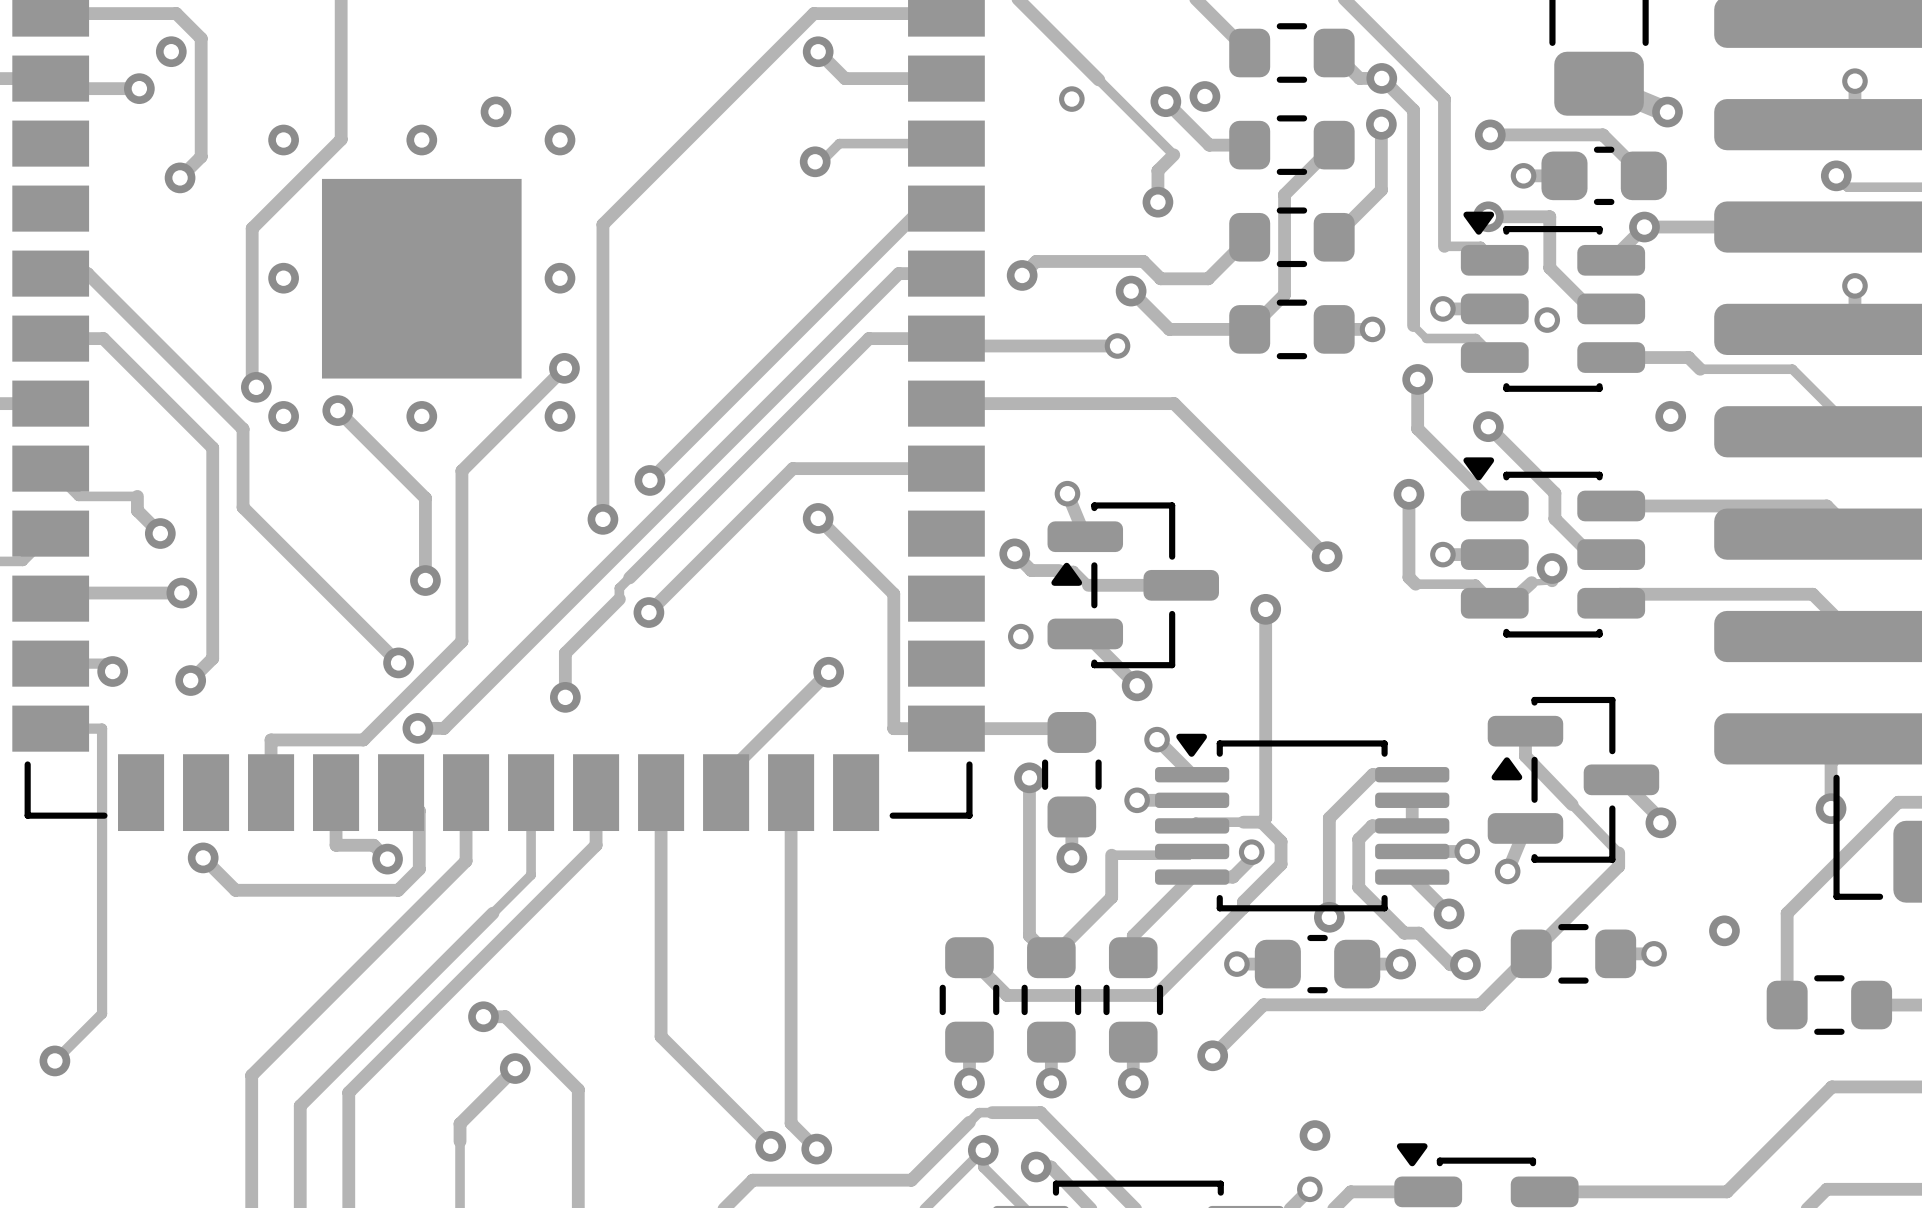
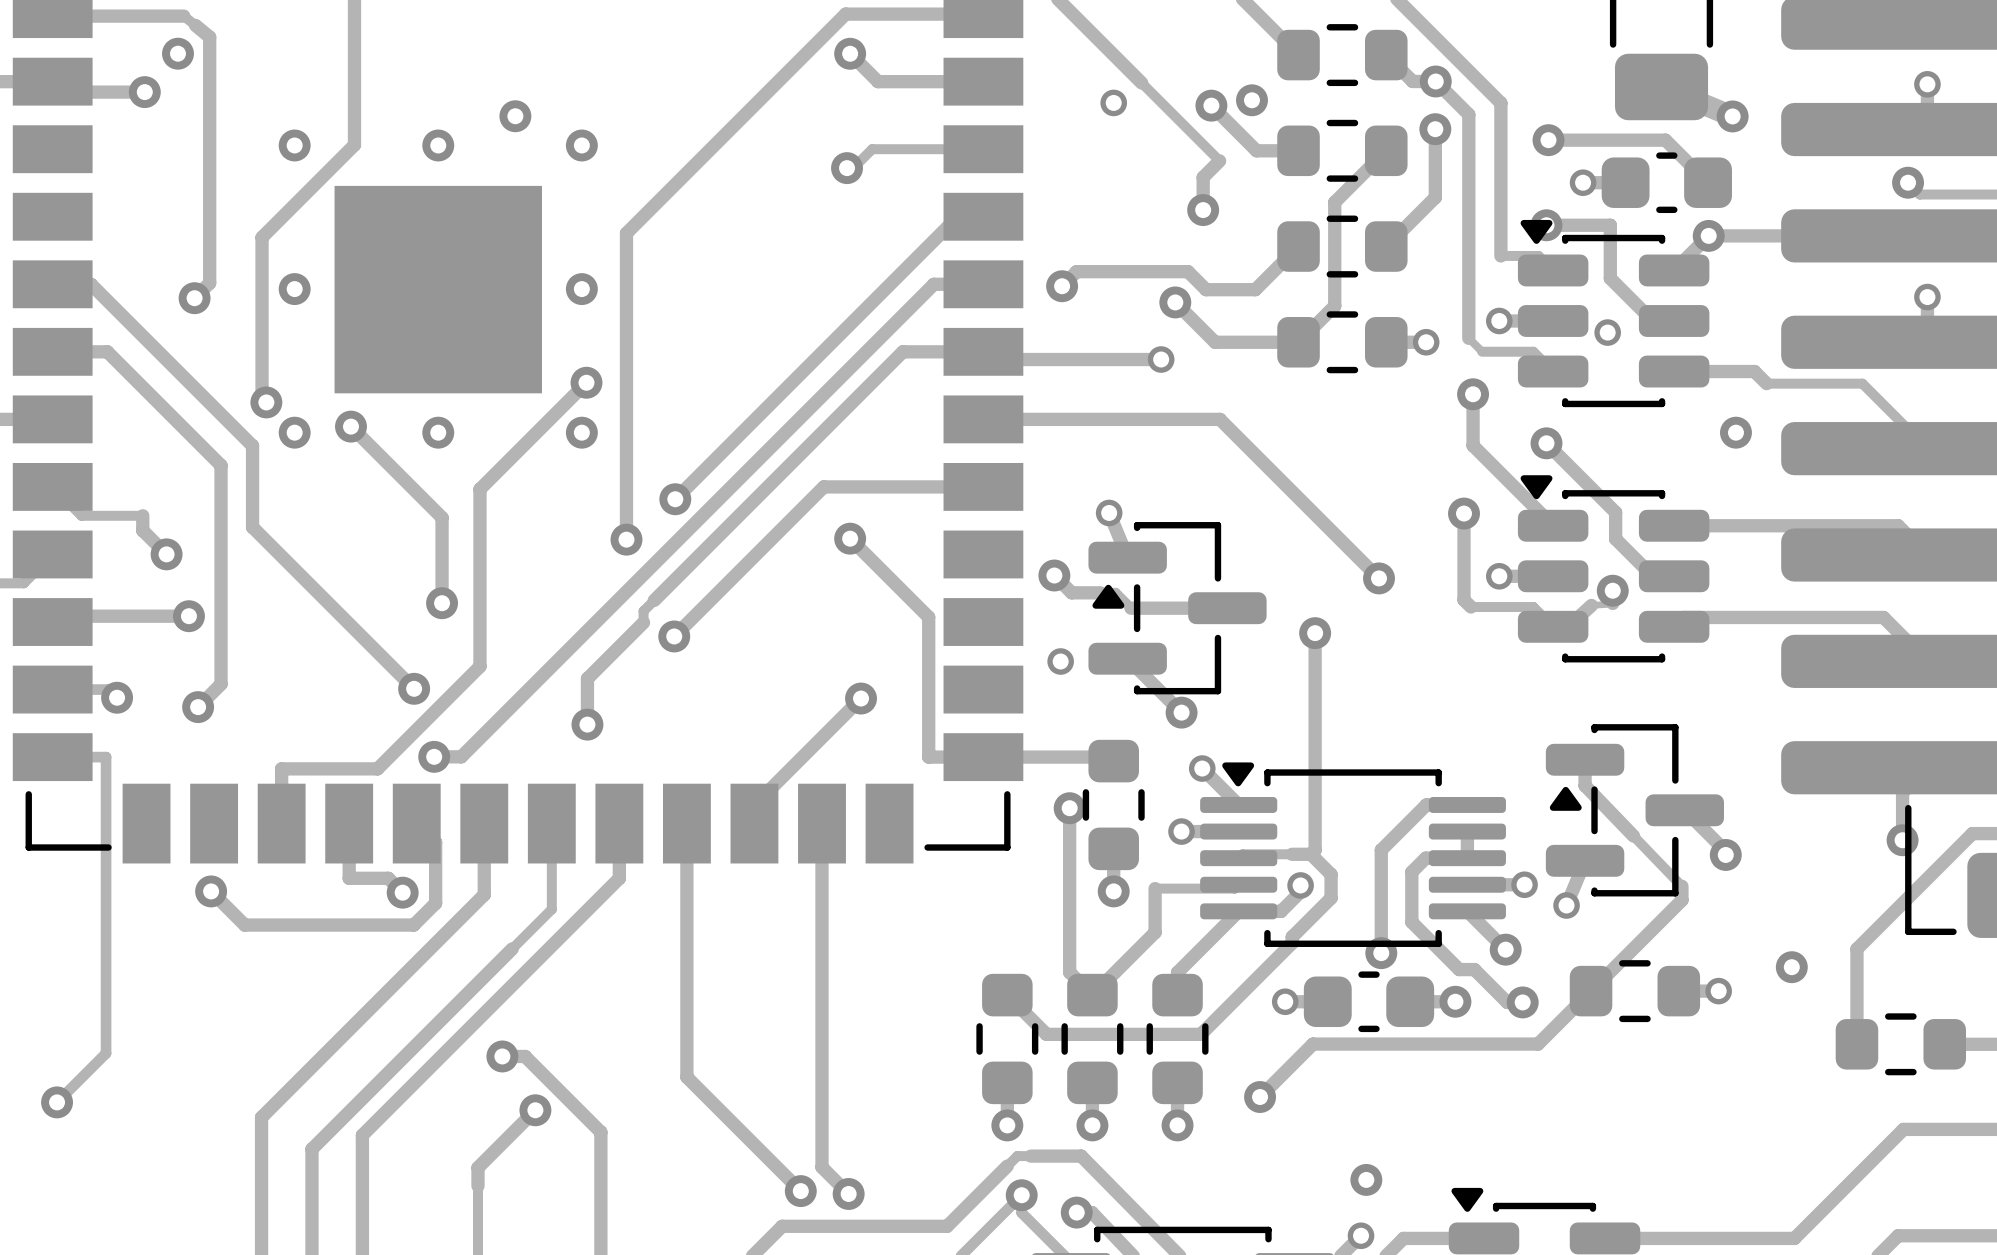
track: (50, 13) (176, 13) (201, 38) (201, 156) (180, 177) -> none
track: none -> (54, 16) (183, 16) (209, 37) (209, 283) (194, 298)
via position: (180, 177) -> (194, 298)

